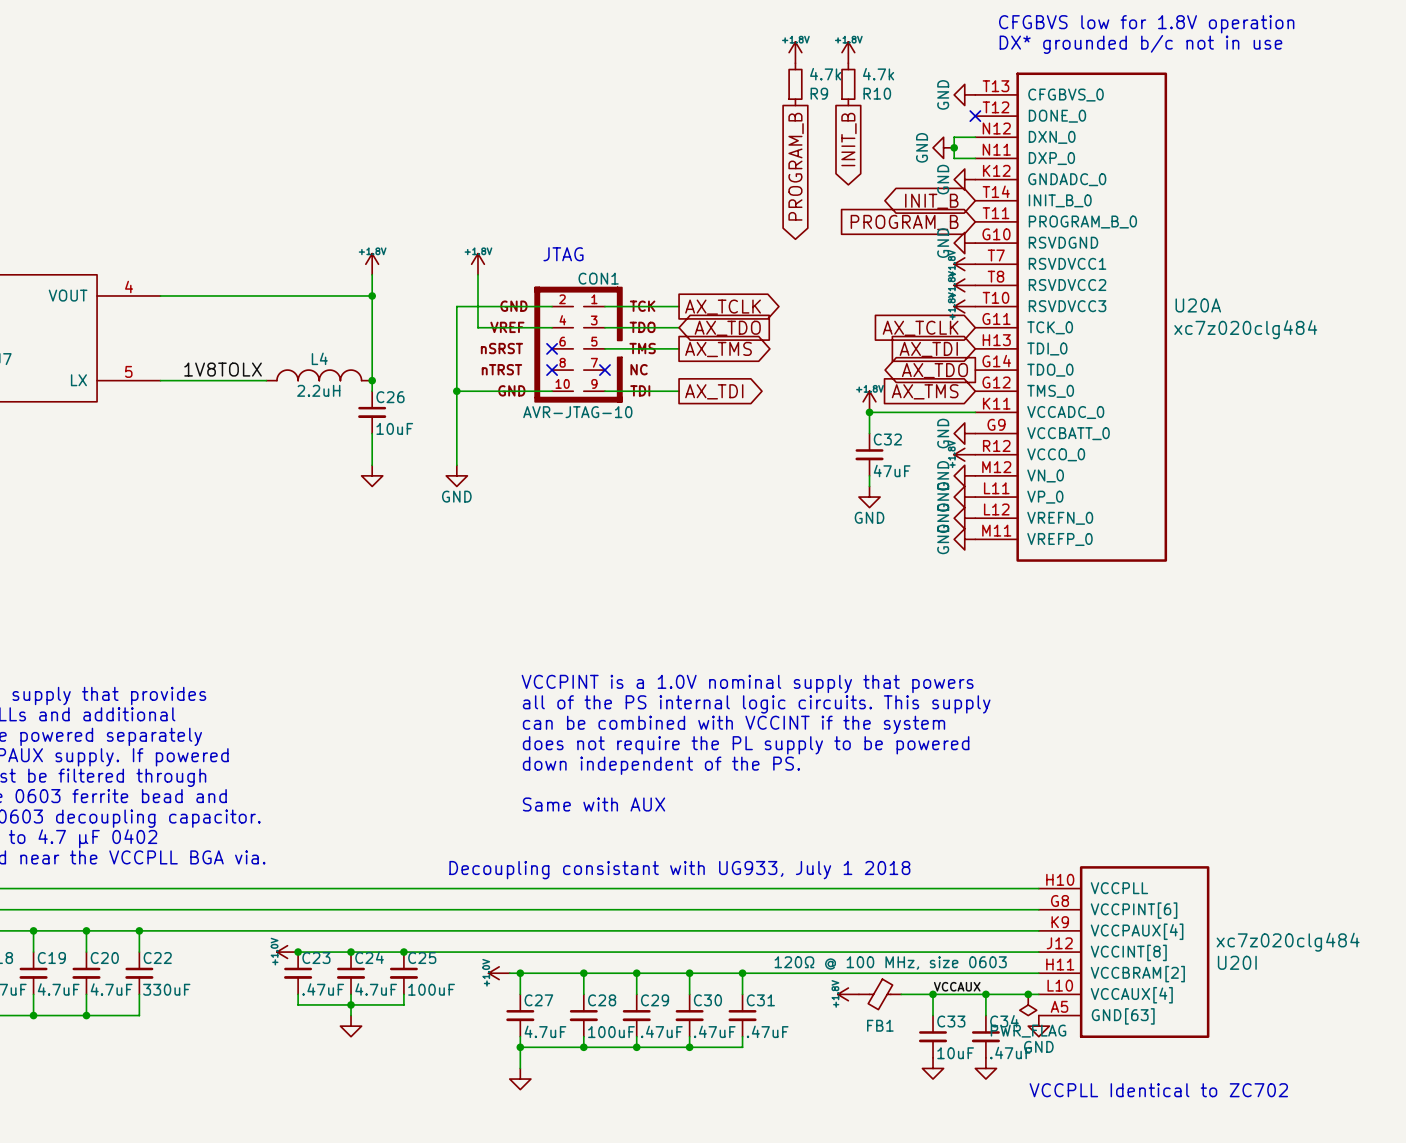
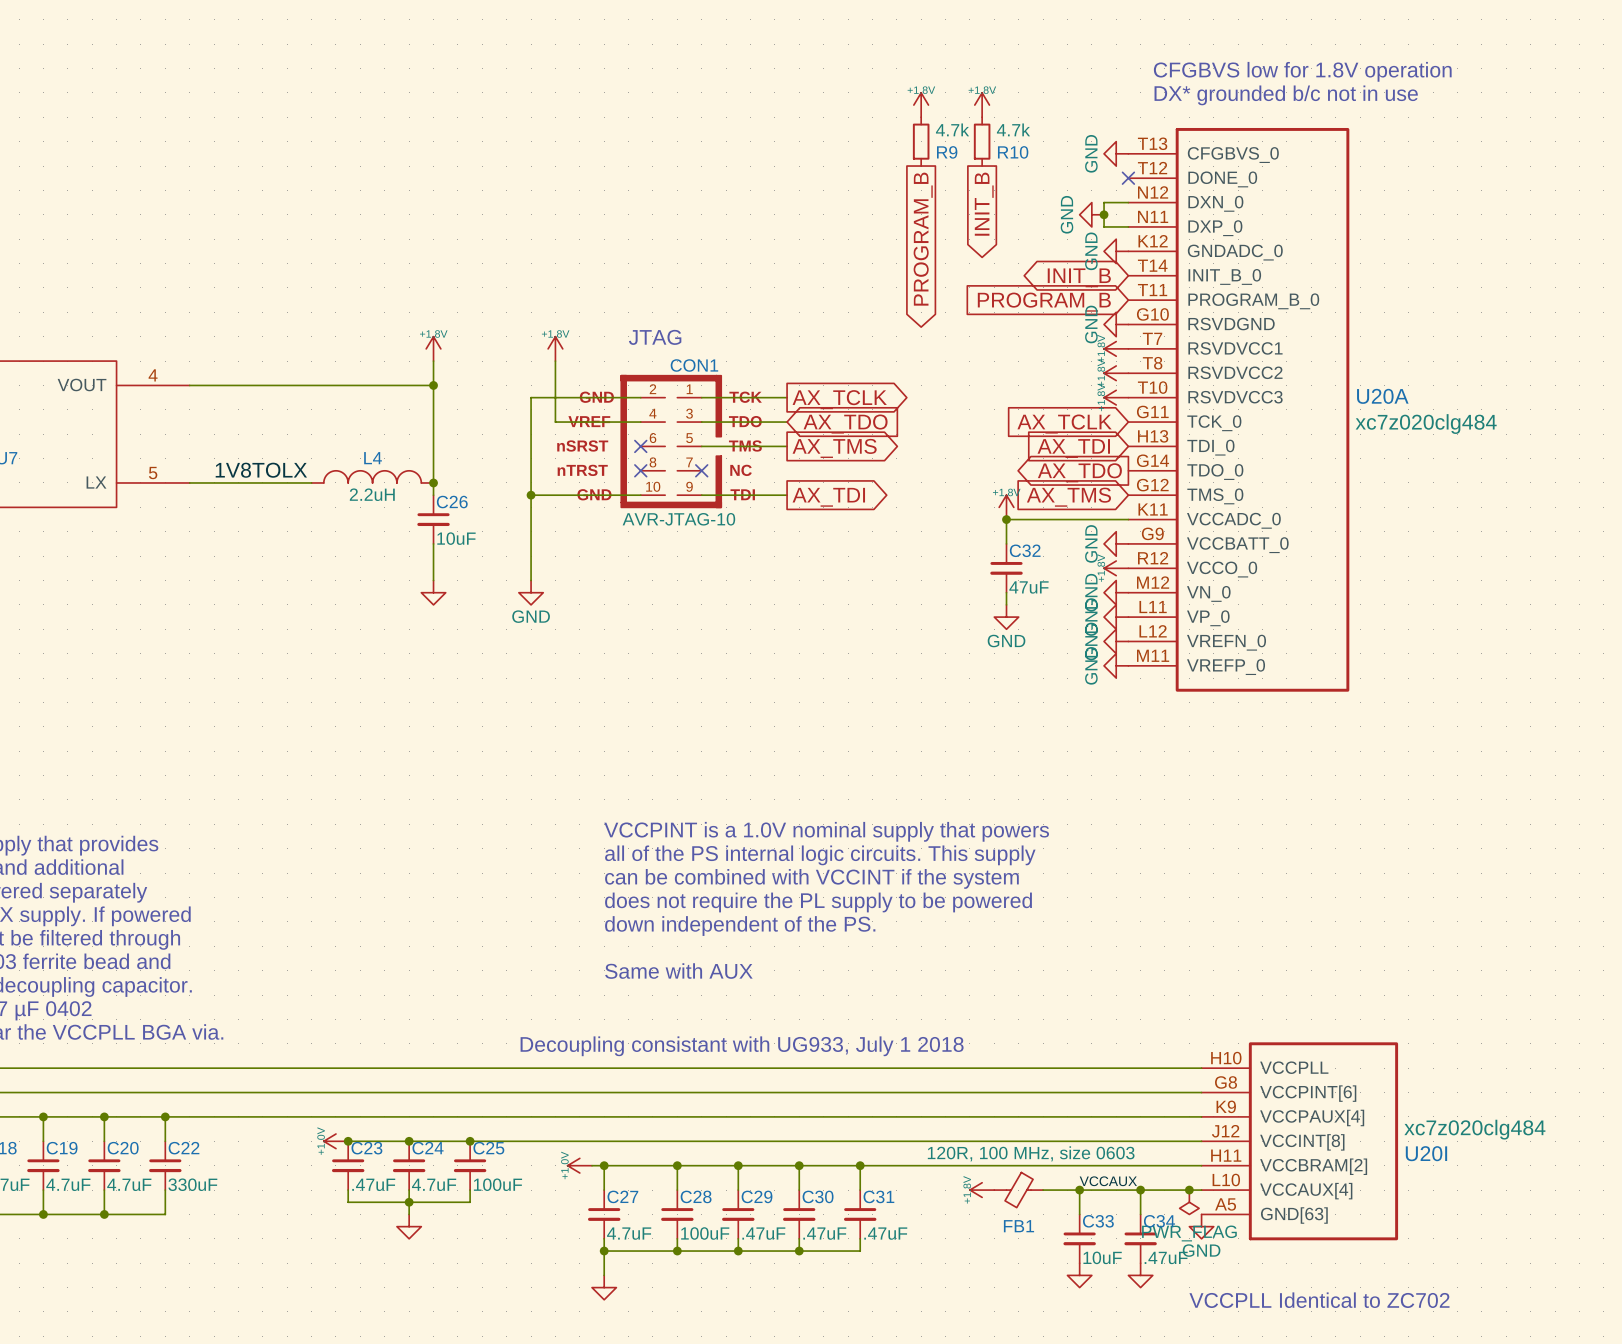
FB1 value: 120Ω @ 100 MHz, size 0603 (890, 963) -> 120R, 100 MHz, size 0603 (1031, 1153)

